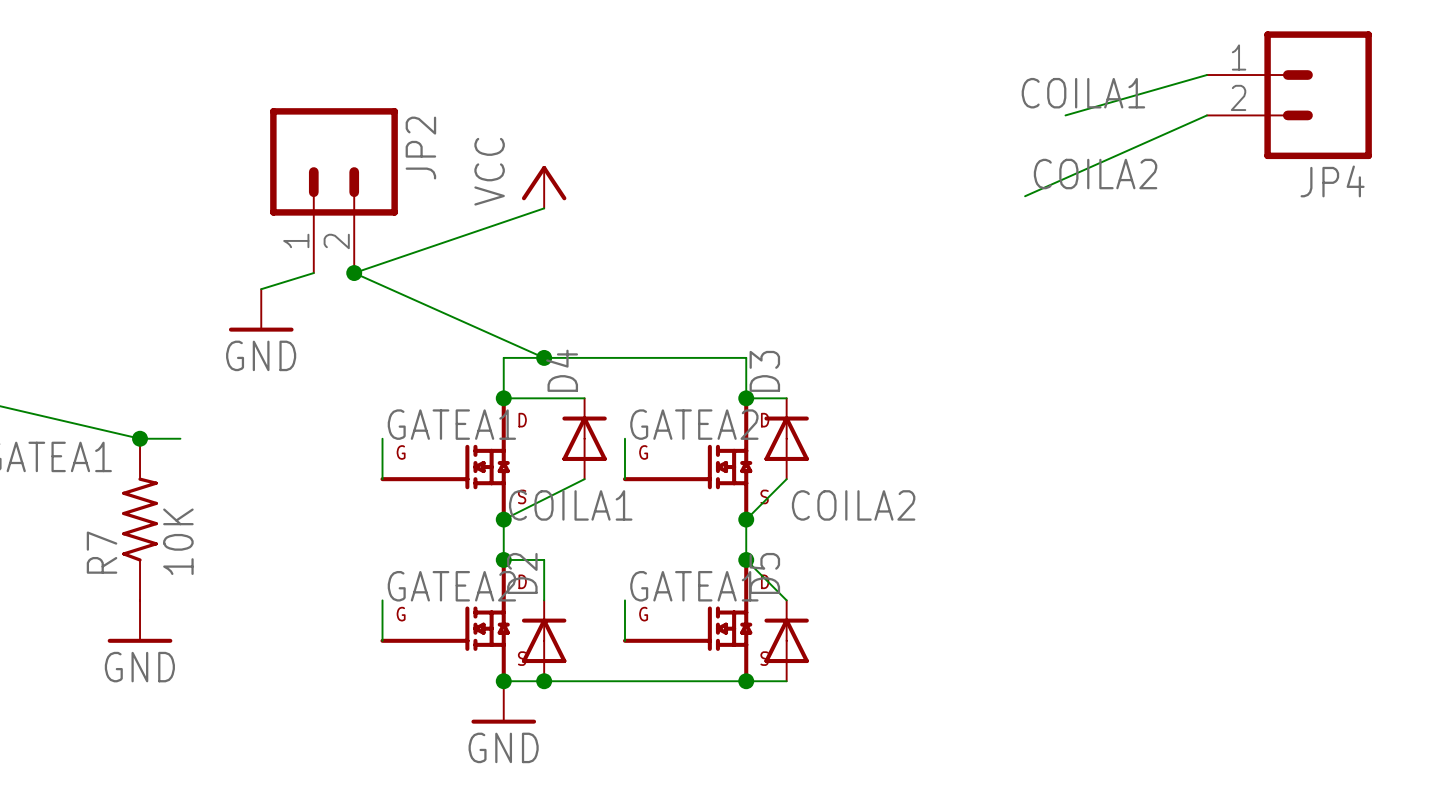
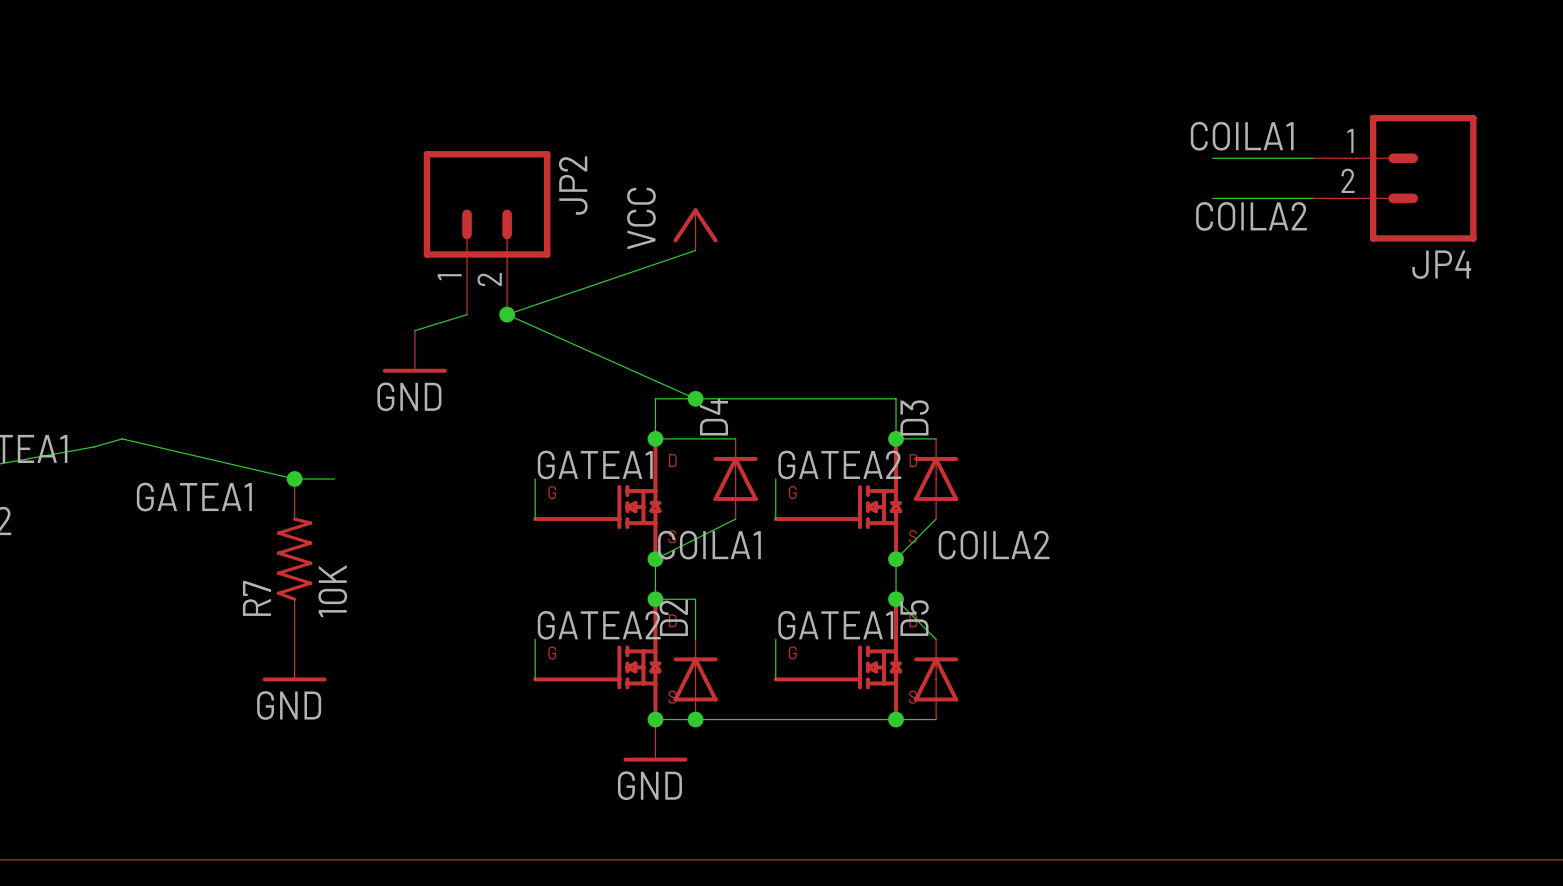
wire: (1206, 75) (1065, 115) -> (1312, 158) (1212, 158)
JP4 position: (1289, 95) -> (1394, 178)
wire: (1206, 115) (1025, 196) -> none
wire: none -> (1212, 198) (1312, 198)

